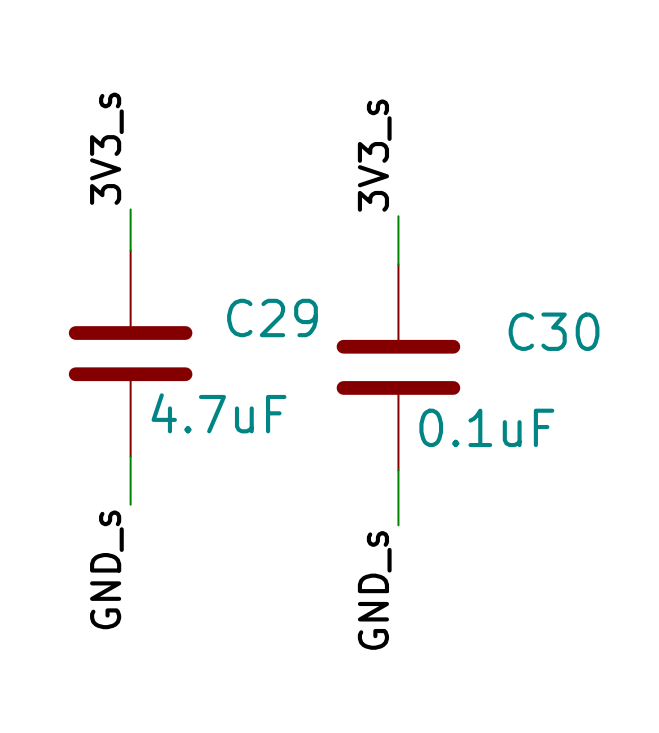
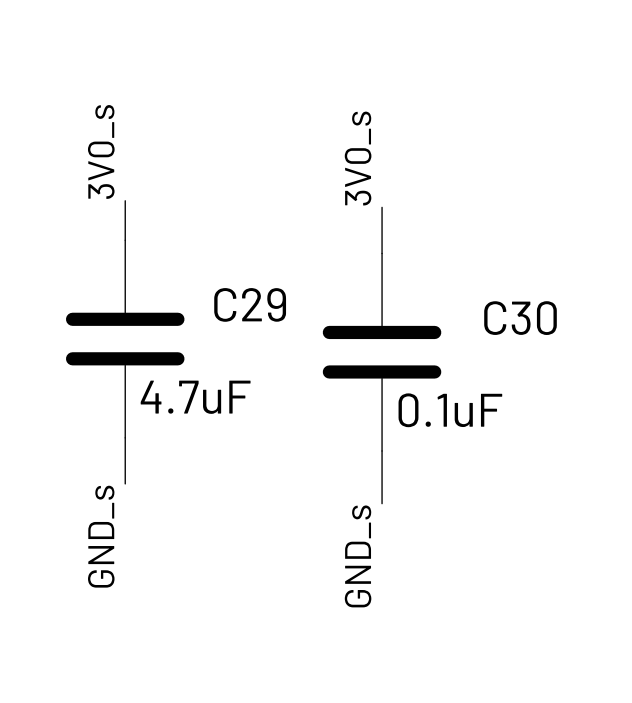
label: 3V3_s (106, 148) -> 3V0_s (101, 151)
label: 3V3_s (374, 155) -> 3V0_s (358, 158)

